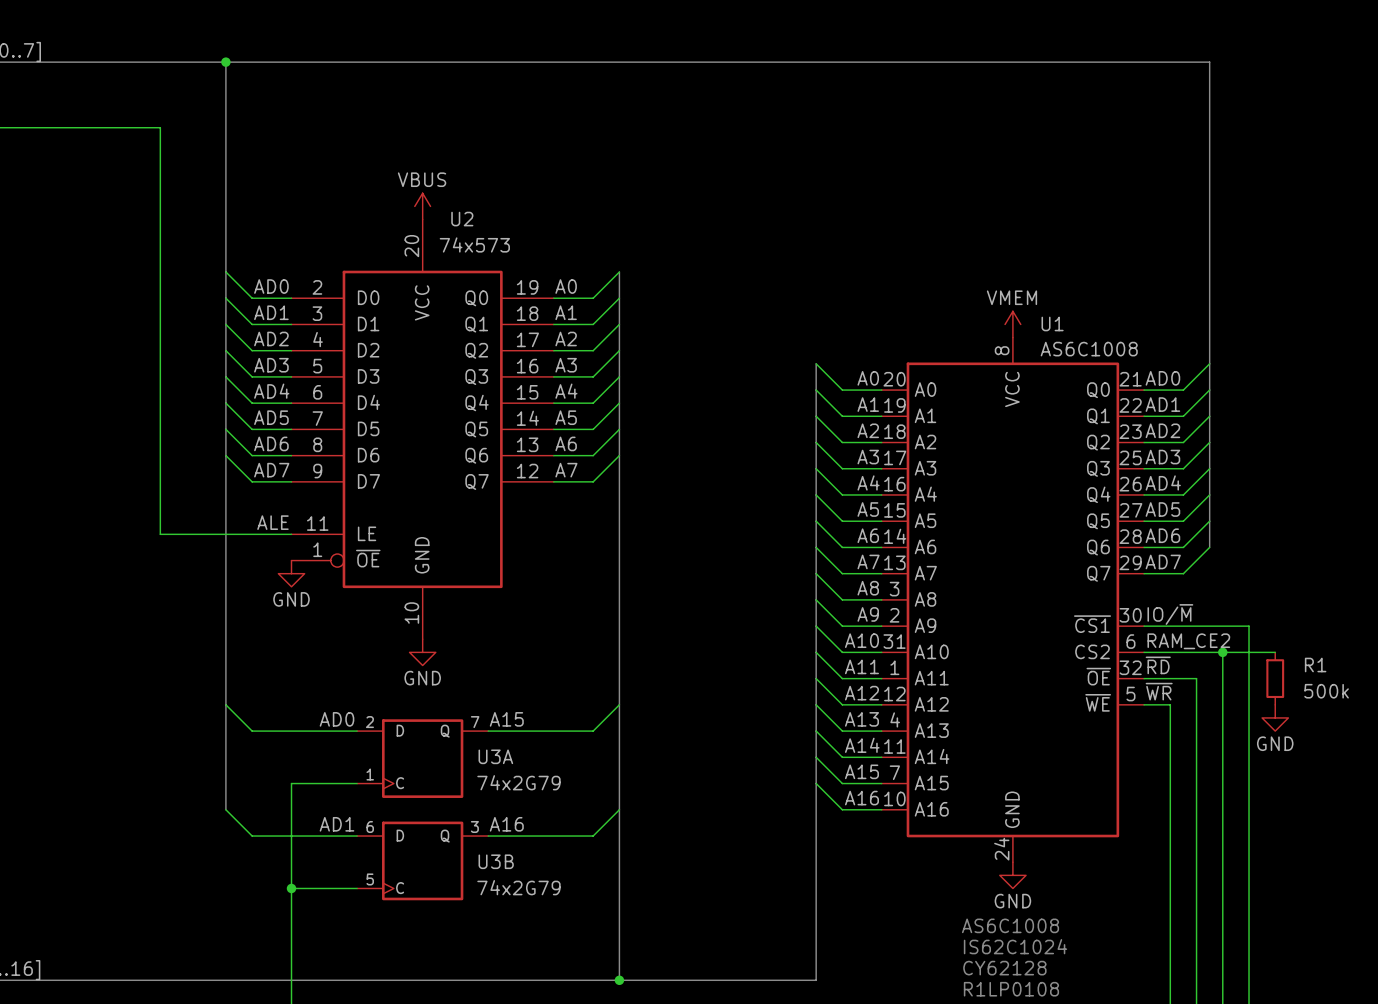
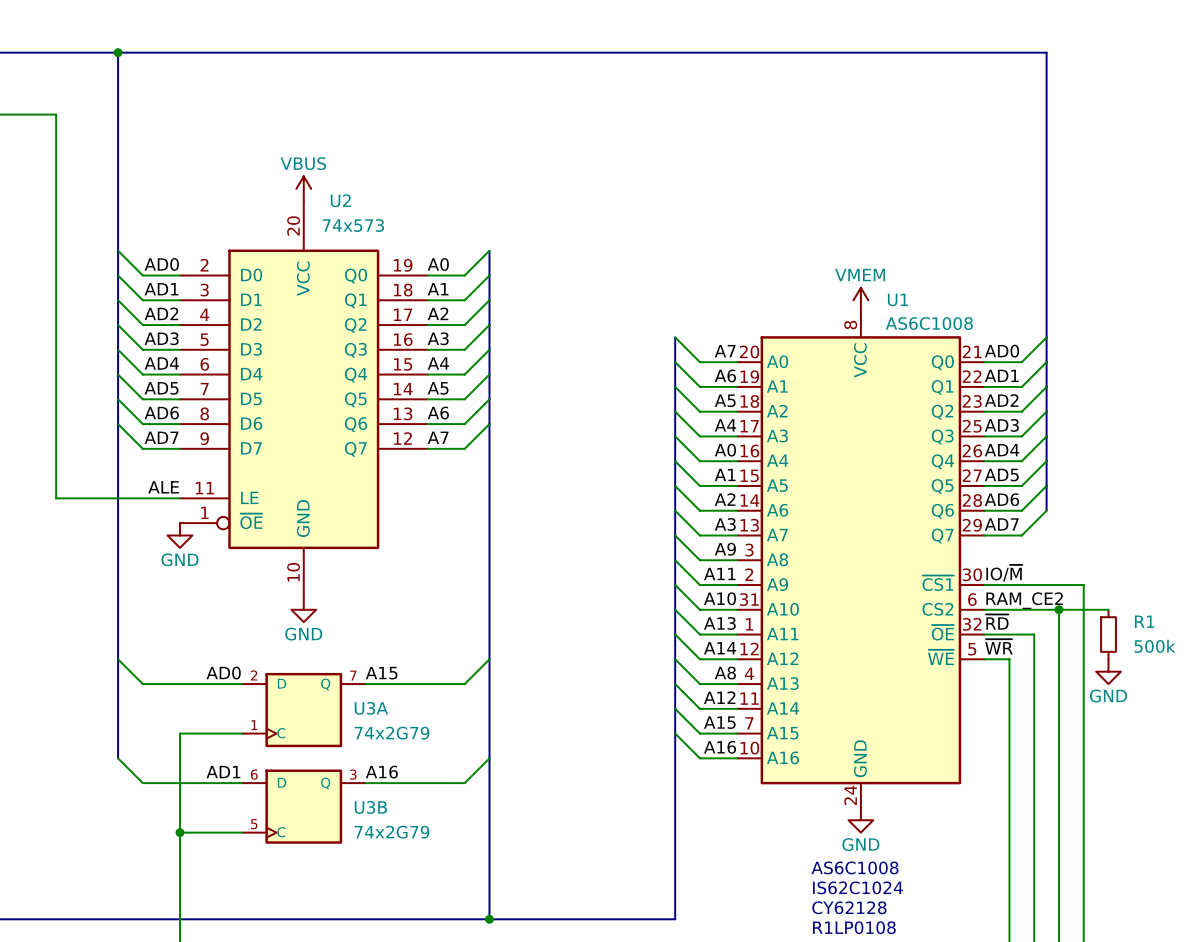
label: A0 (868, 378) -> A7 (725, 351)
label: A1 (868, 404) -> A6 (725, 375)
label: A2 (868, 430) -> A5 (725, 400)
label: A3 (868, 457) -> A4 (725, 425)
label: A4 (868, 482) -> A0 (725, 450)
label: A5 (868, 509) -> A1 (725, 474)
label: A6 (868, 535) -> A2 (725, 499)
label: A7 (868, 561) -> A3 (725, 524)
label: A8 (868, 588) -> A9 (725, 549)
label: A9 (868, 614) -> A11 (719, 573)
label: A11 (861, 666) -> A13 (719, 623)
label: A12 (861, 693) -> A14 (720, 648)
label: A13 (861, 719) -> A8 (725, 673)
label: A14 (862, 745) -> A12 (719, 697)

